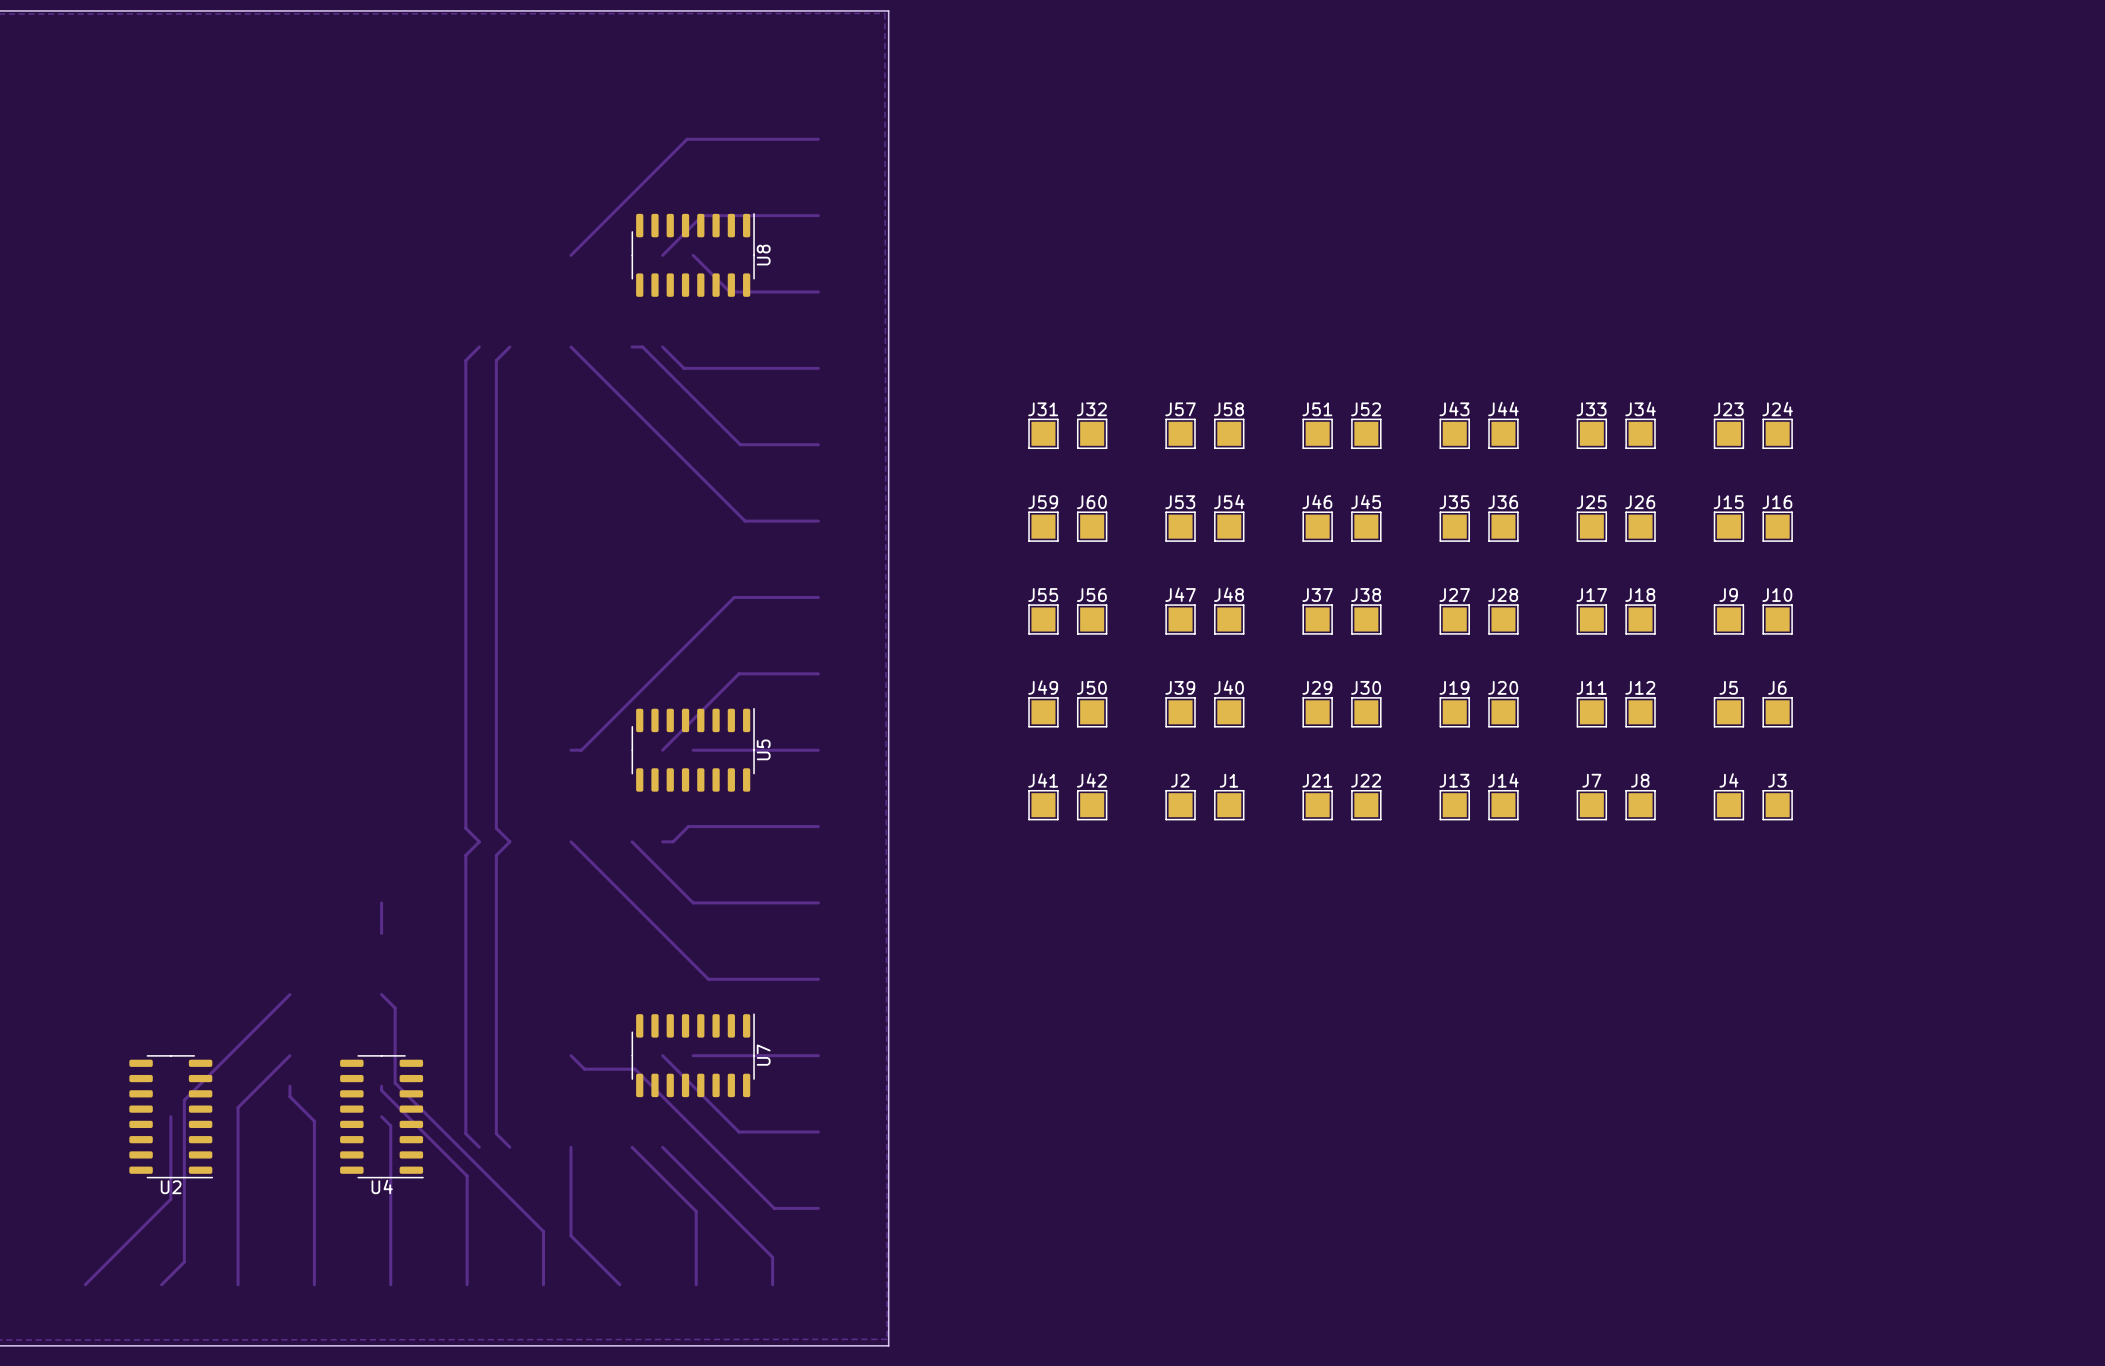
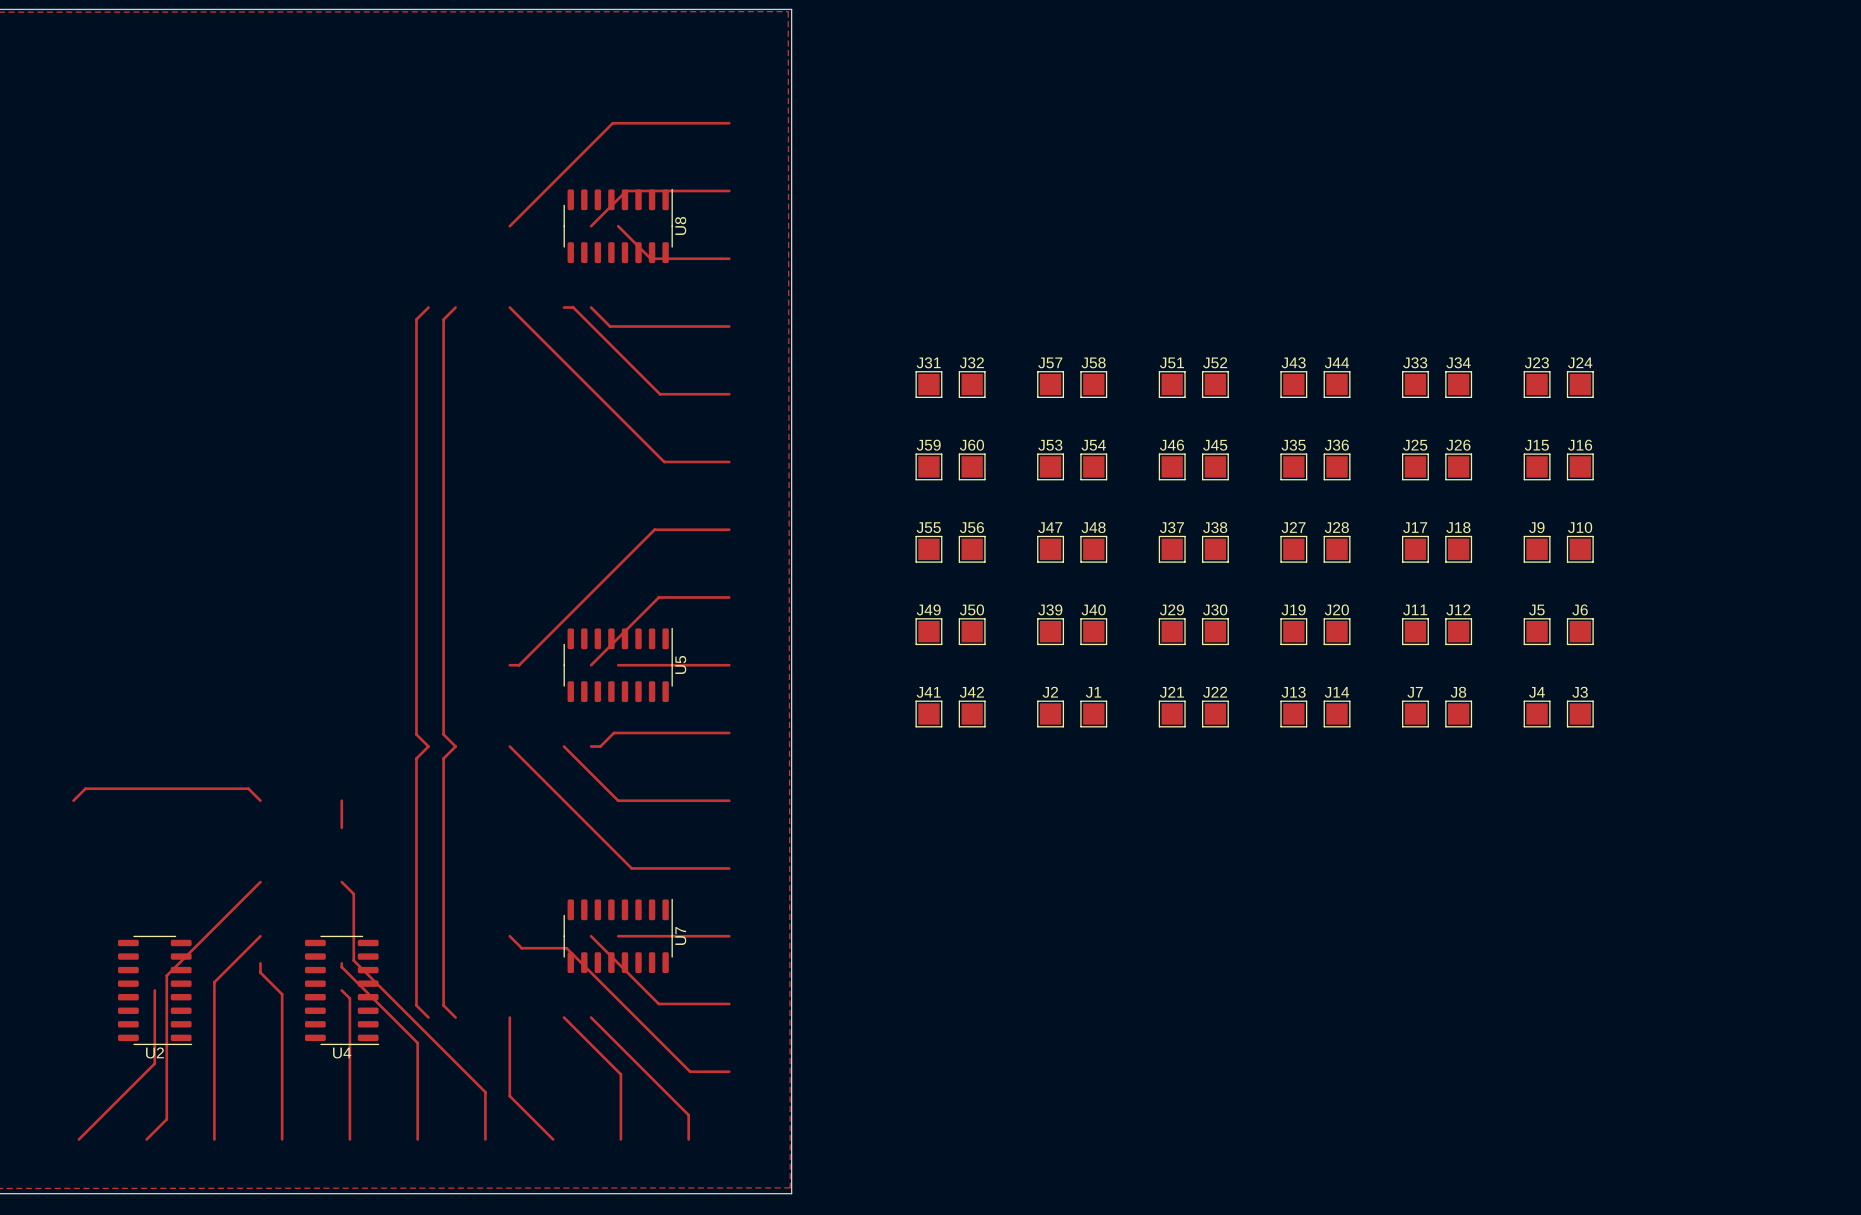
track: none -> (73, 800) (85, 788) (248, 788) (260, 800)

